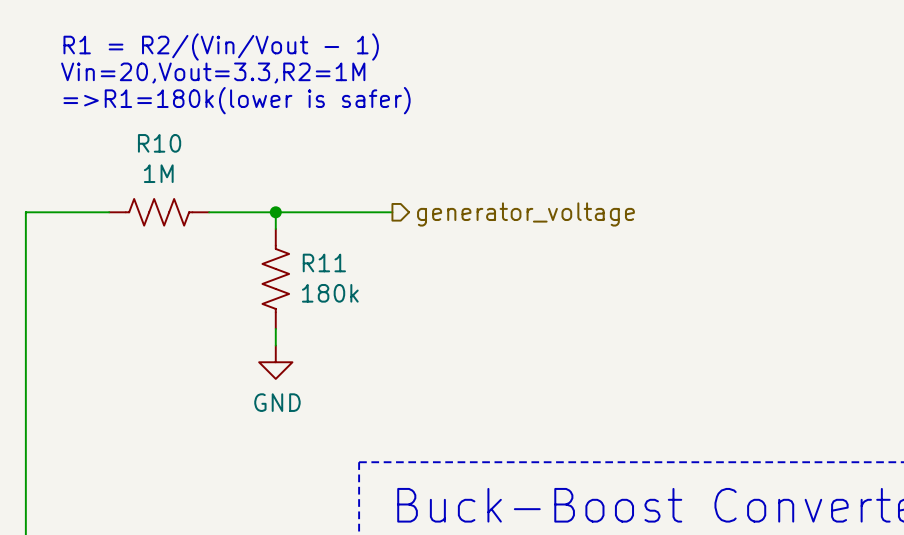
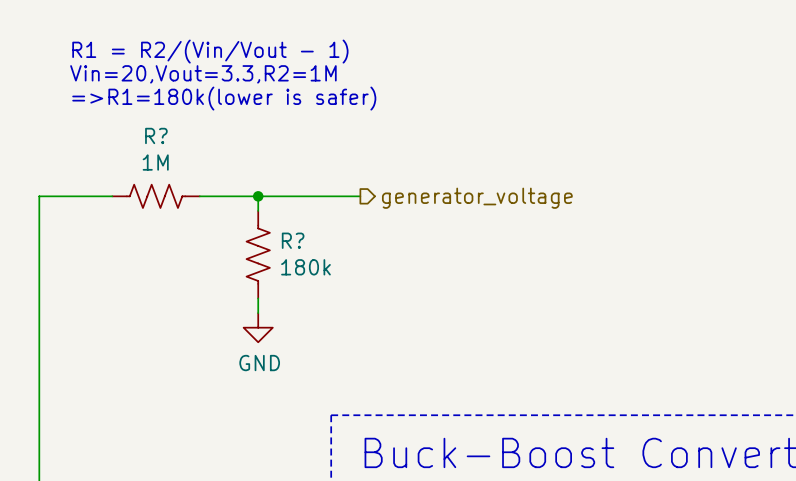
R10 name: R10 (159, 143) -> R? (156, 135)
R11 name: R11 (324, 262) -> R? (293, 240)

